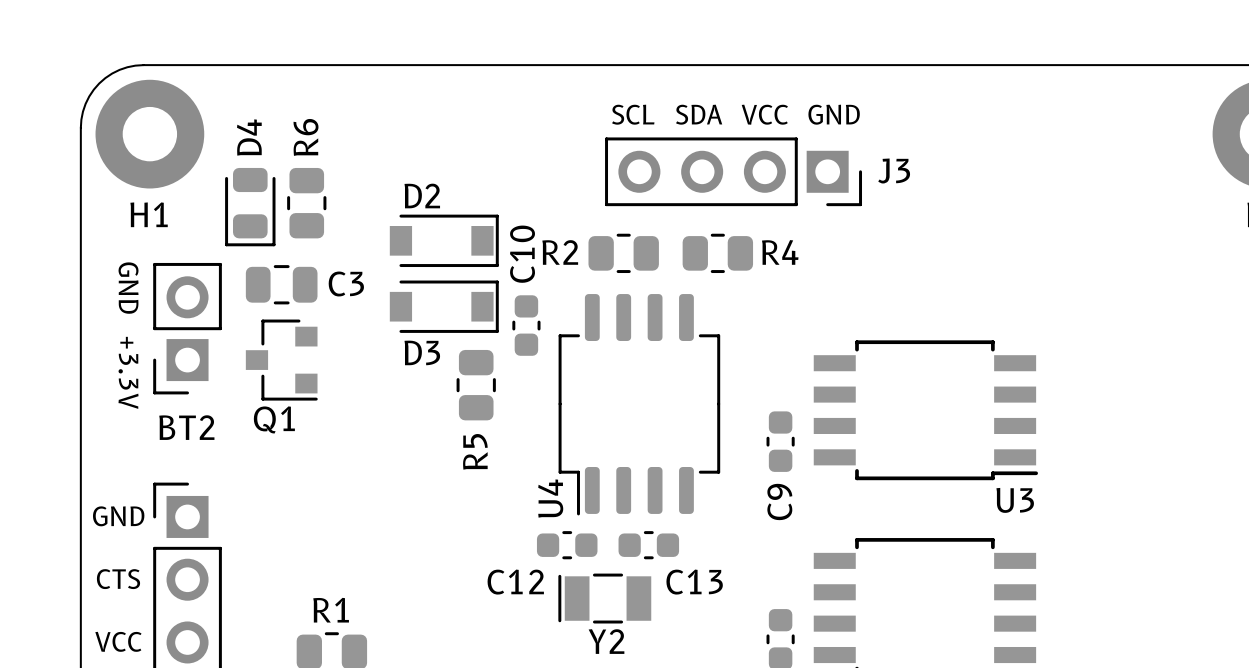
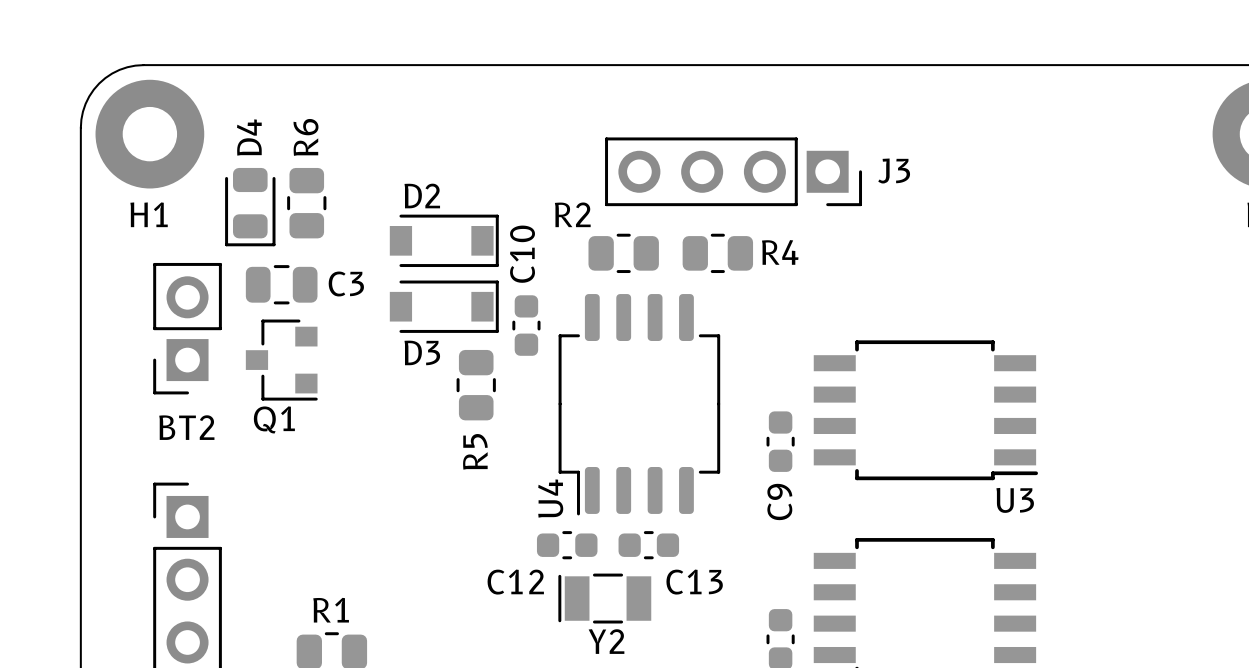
text: SCL (633, 114) -> none
text: SDA (699, 114) -> none
text: VCC (764, 114) -> none
text: GND (834, 114) -> none
R2 name position: R2 (560, 252) -> R2 (572, 214)
text: GND (128, 288) -> none
text: +3.3V (128, 372) -> none
text: GND (118, 516) -> none
text: CTS (118, 579) -> none
text: VCC (118, 641) -> none

